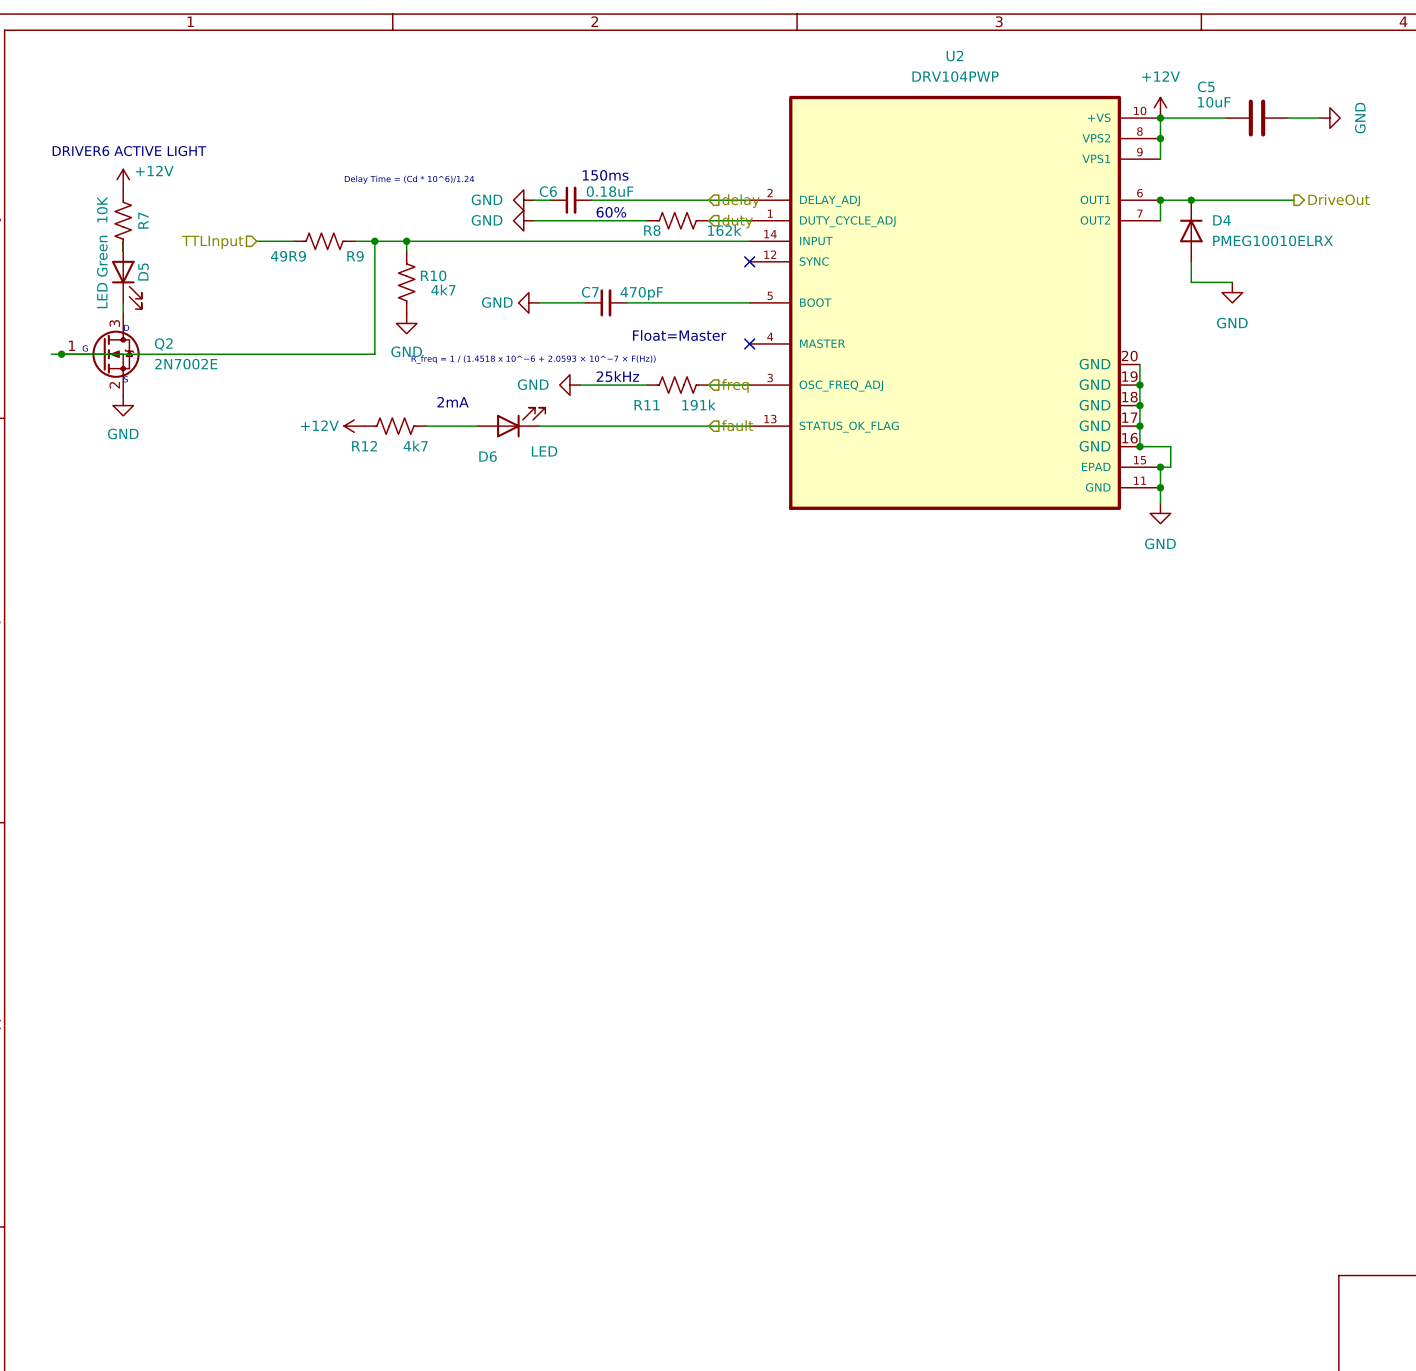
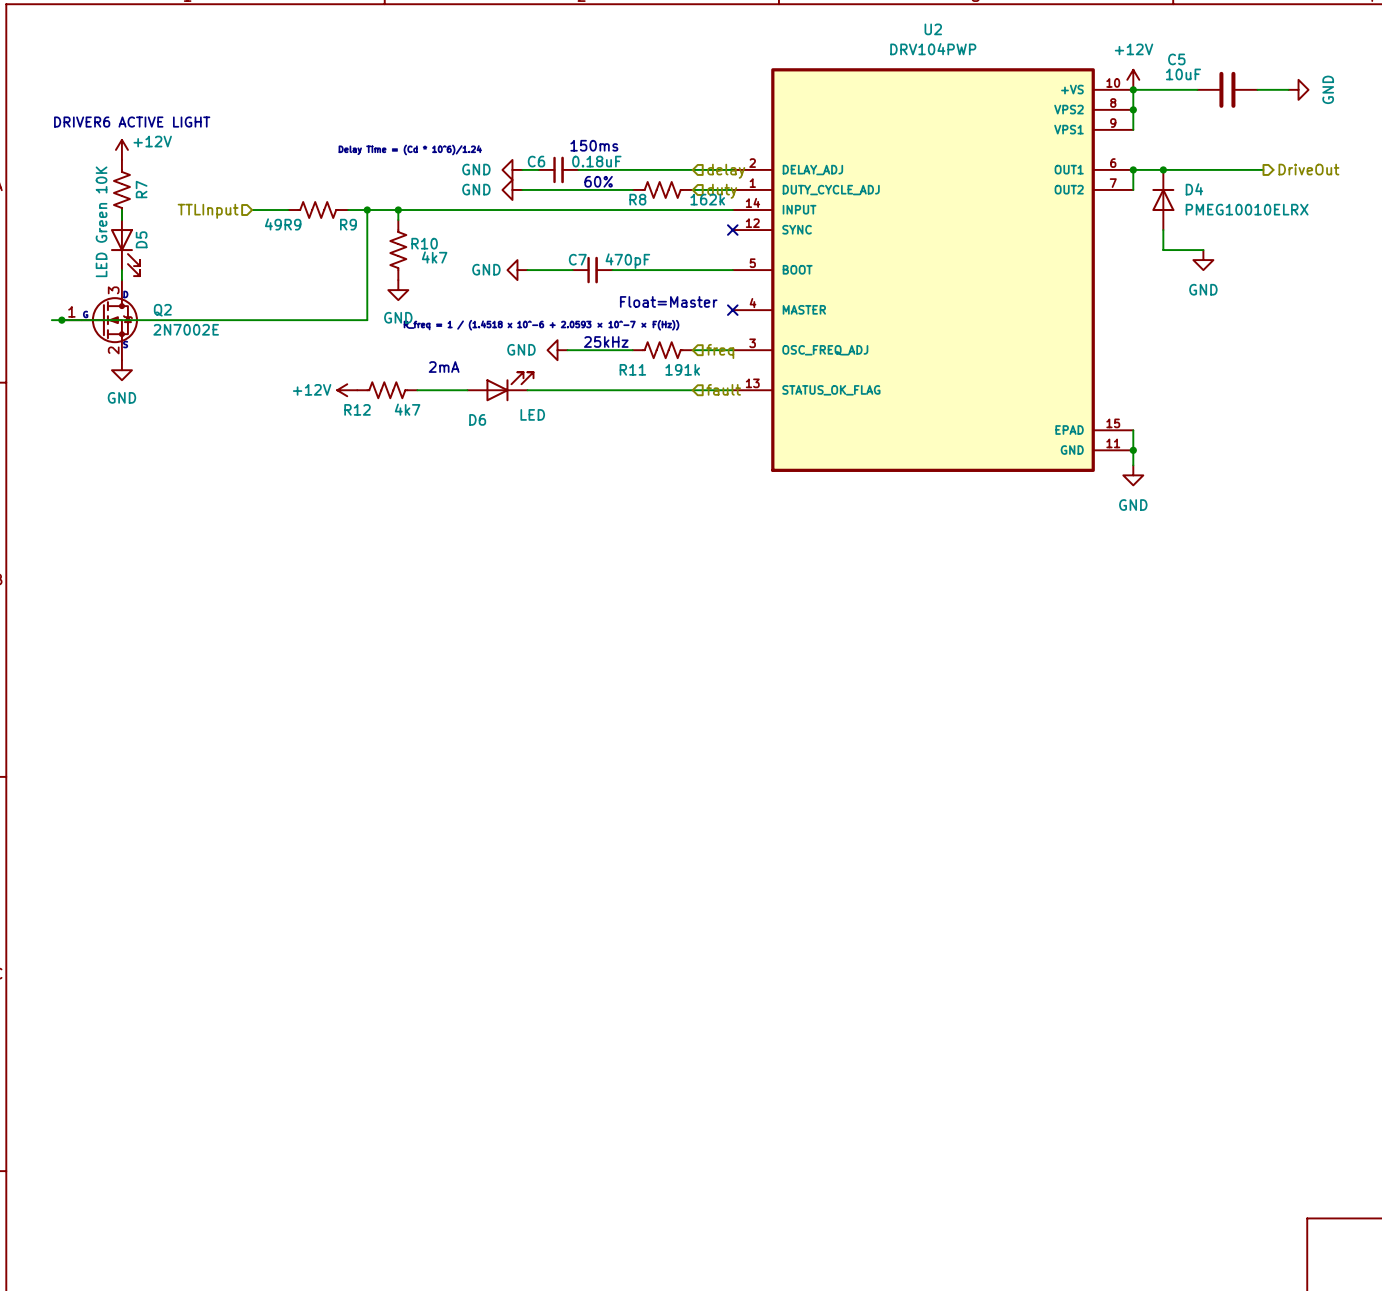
U2 symbol: [749, 95, 1161, 510] -> [732, 68, 1134, 472]
wire: (1139, 364) (1139, 446) (1170, 446) (1170, 467) (1160, 467) -> none
junction: (1139, 385) -> none
junction: (1139, 405) -> none
junction: (1139, 426) -> none
junction: (1139, 446) -> none
junction: (1160, 467) -> none

